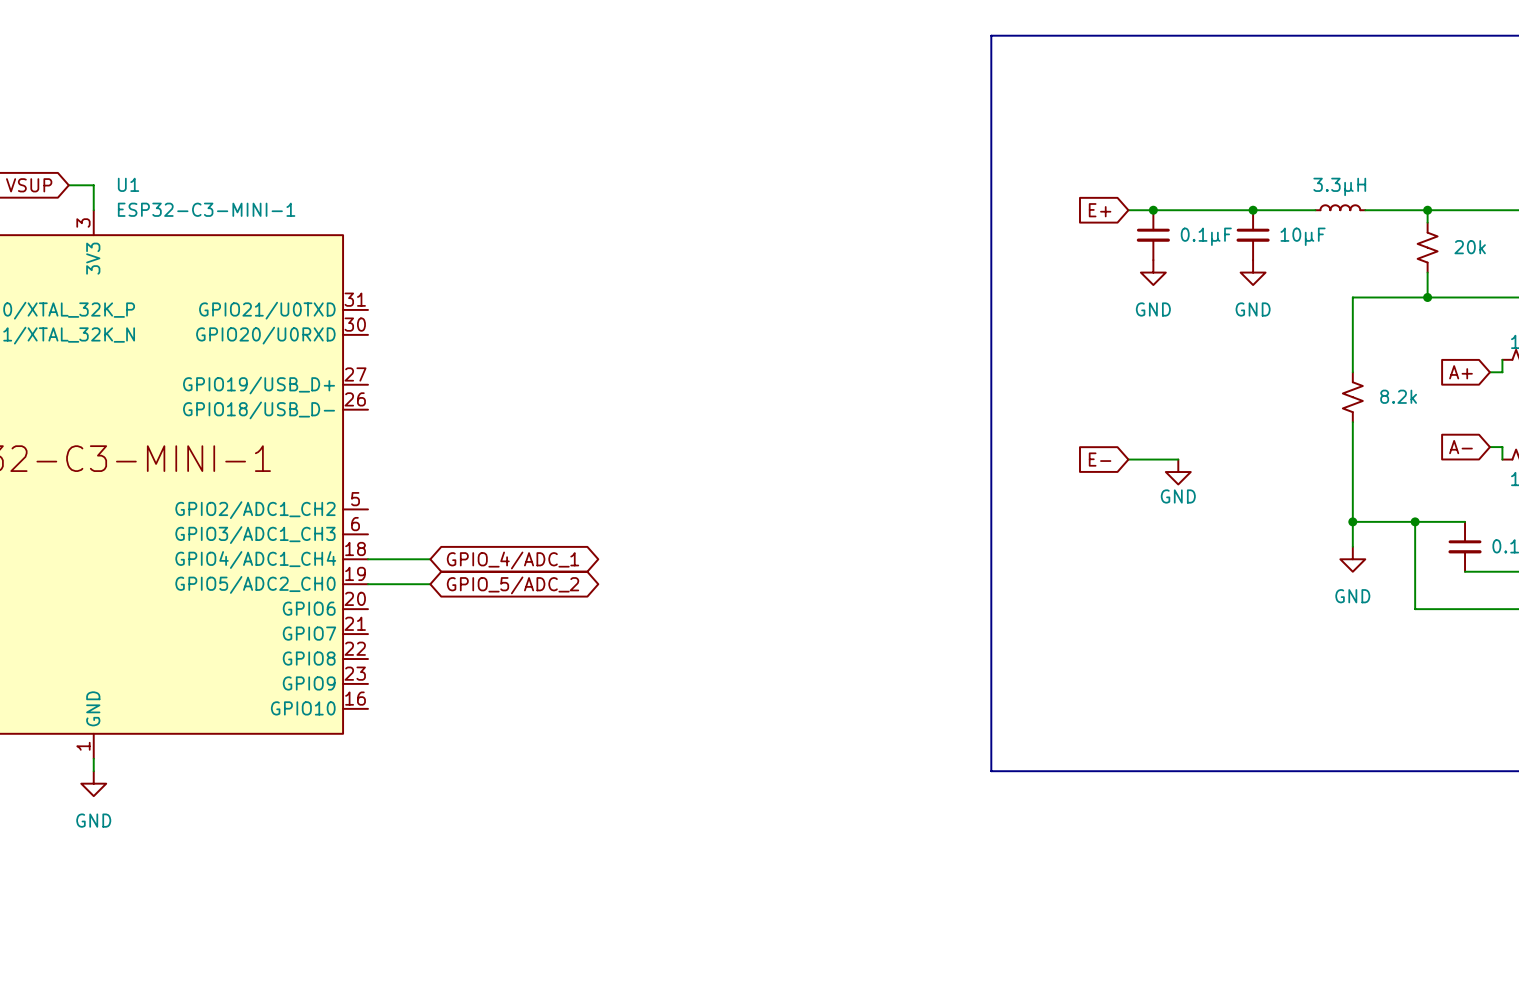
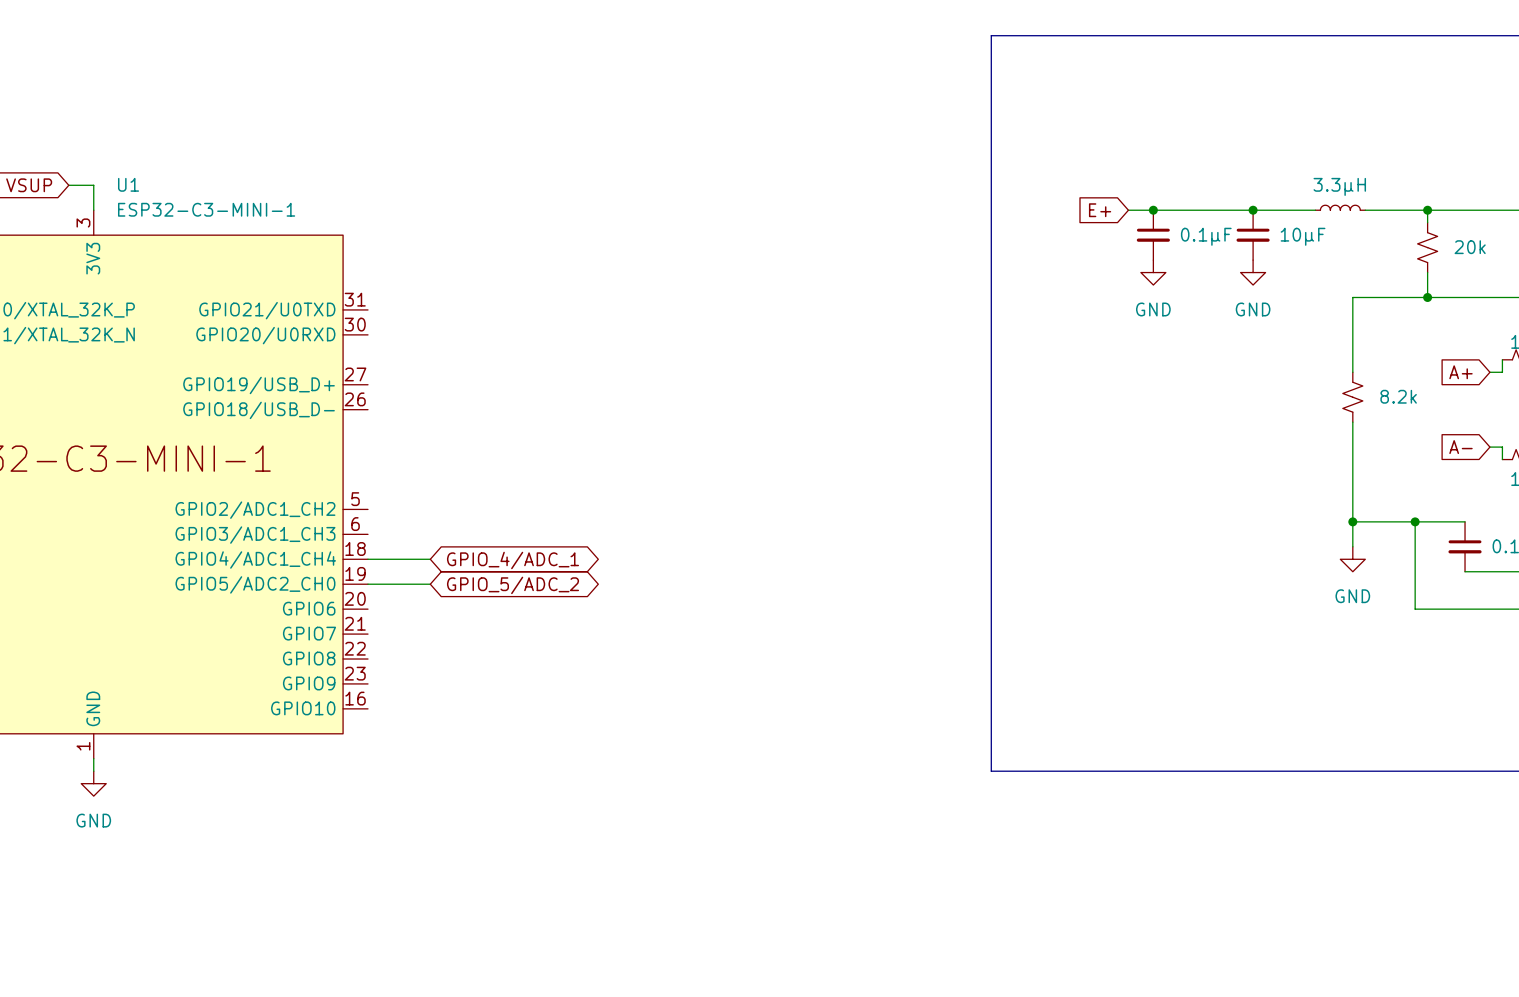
global label: E- (1100, 459) -> none
wire: (1128, 459) (1178, 459) -> none
power symbol: GND (1178, 472) -> none

